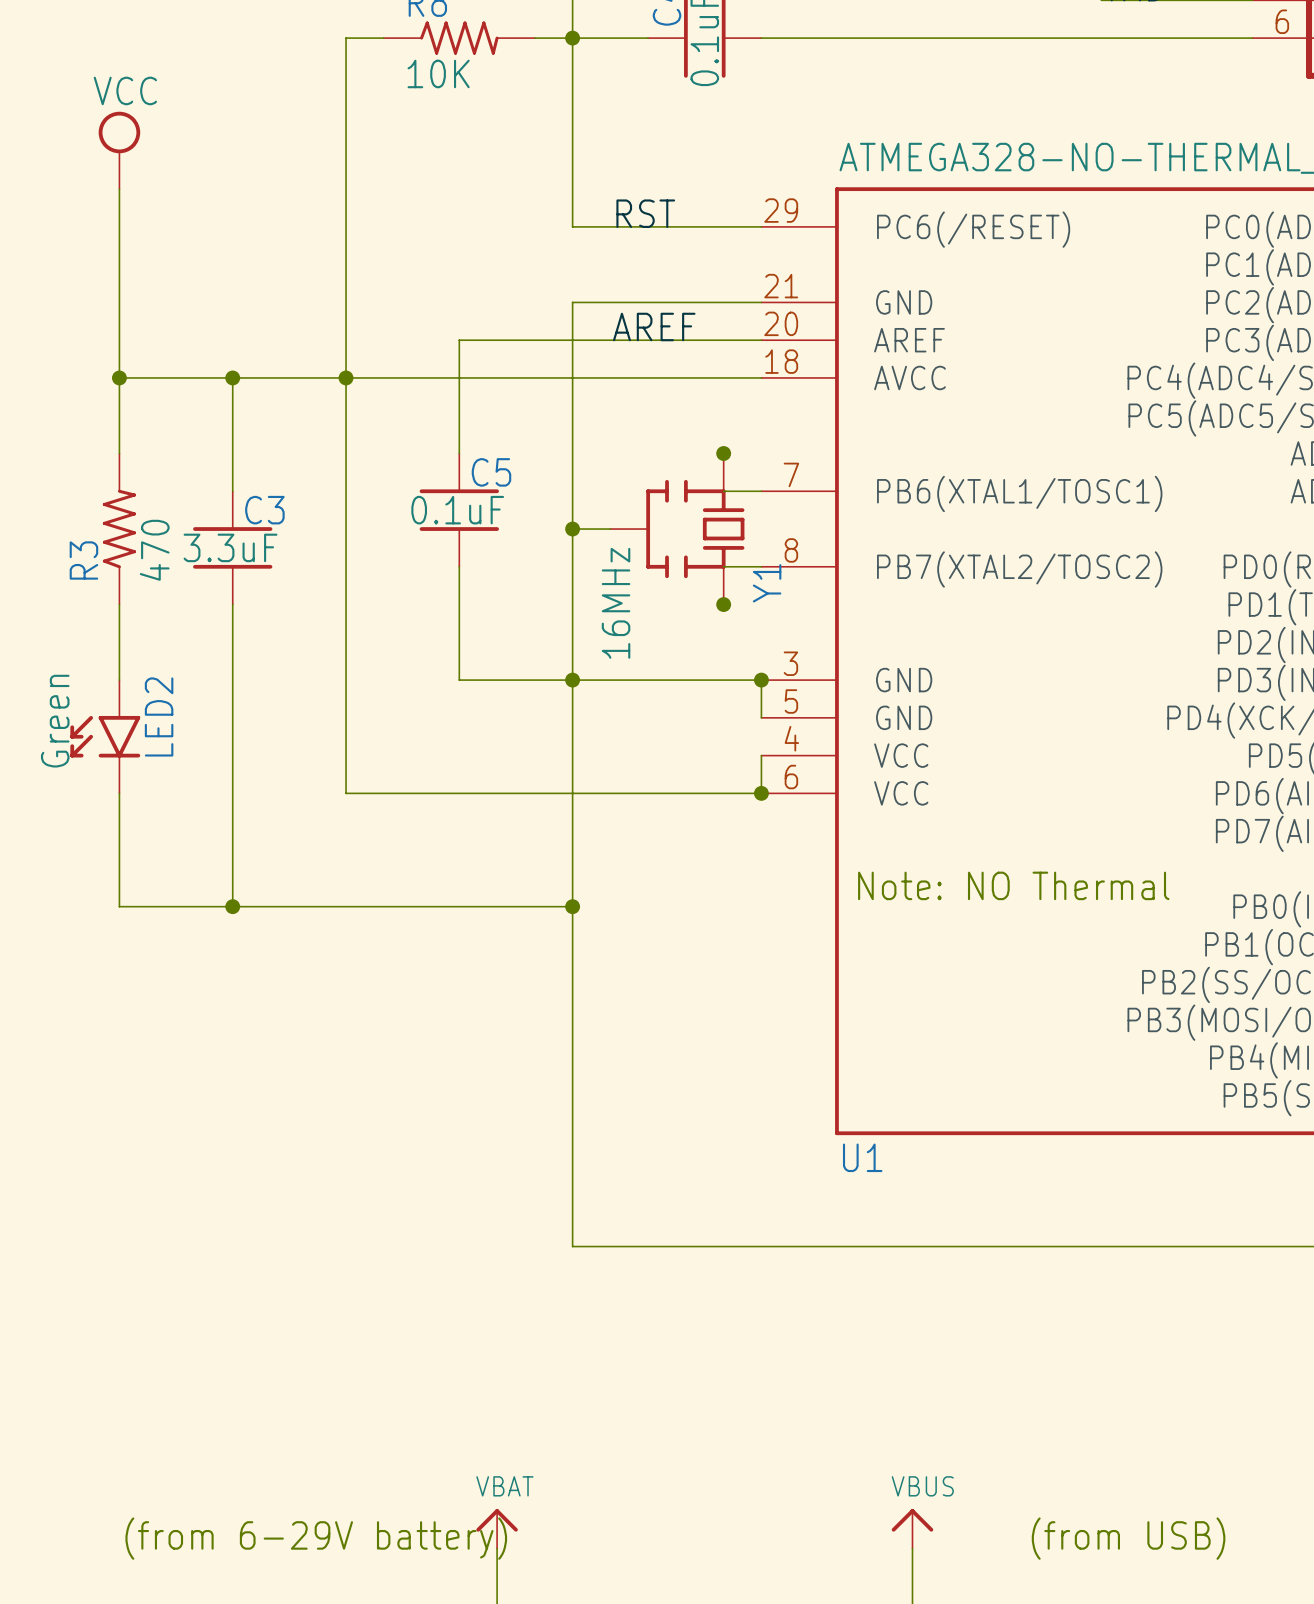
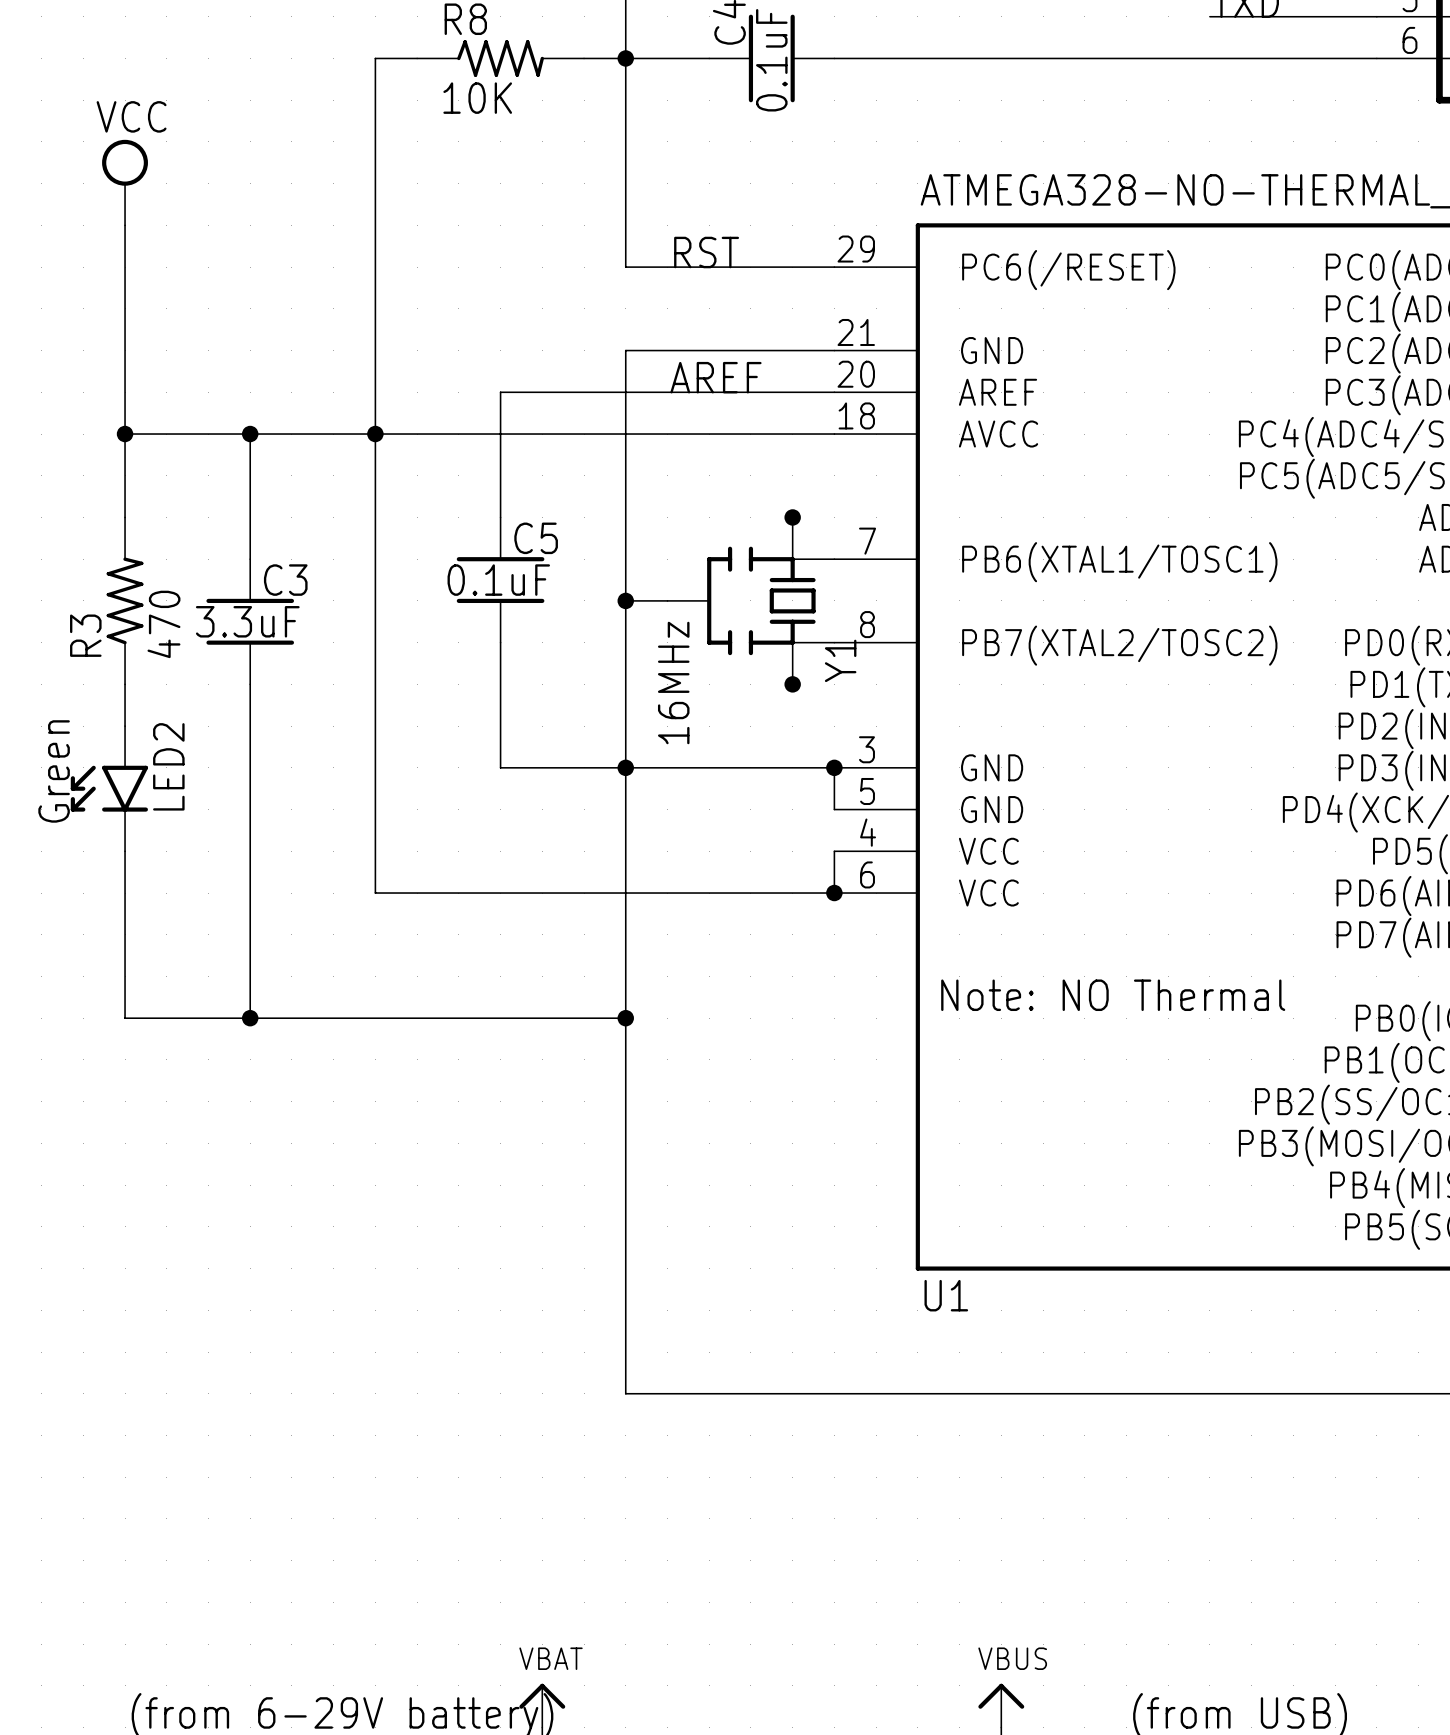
LED2 position: (105, 736) -> (109, 788)

